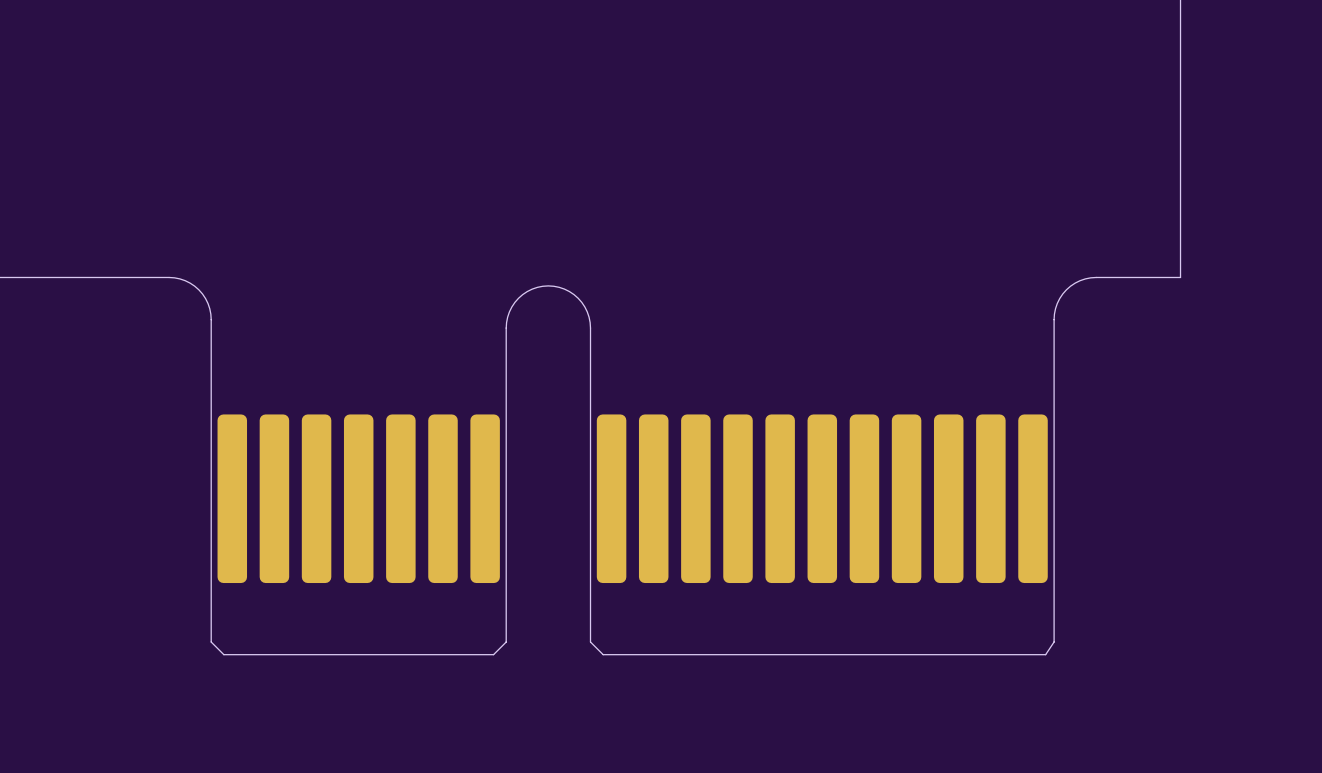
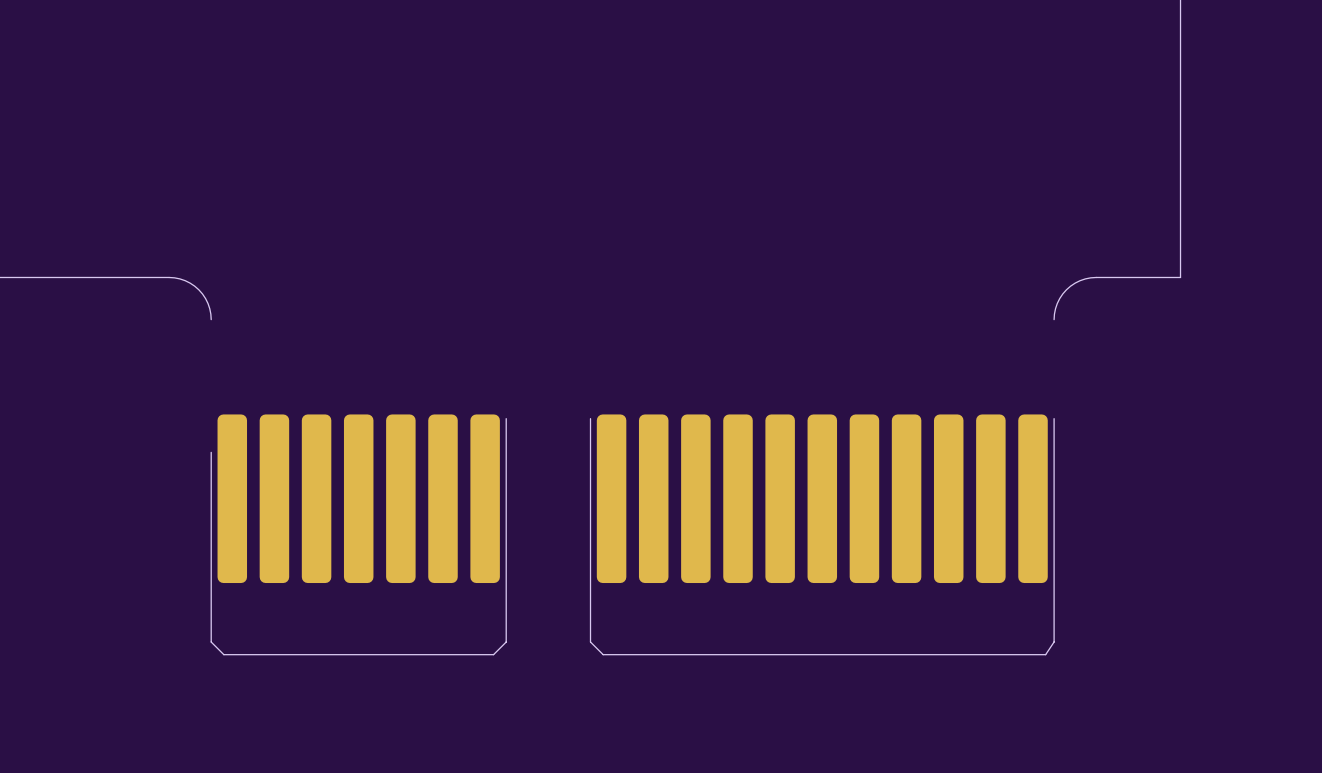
part: (632, 470) -> none
part: none -> (632, 534)

